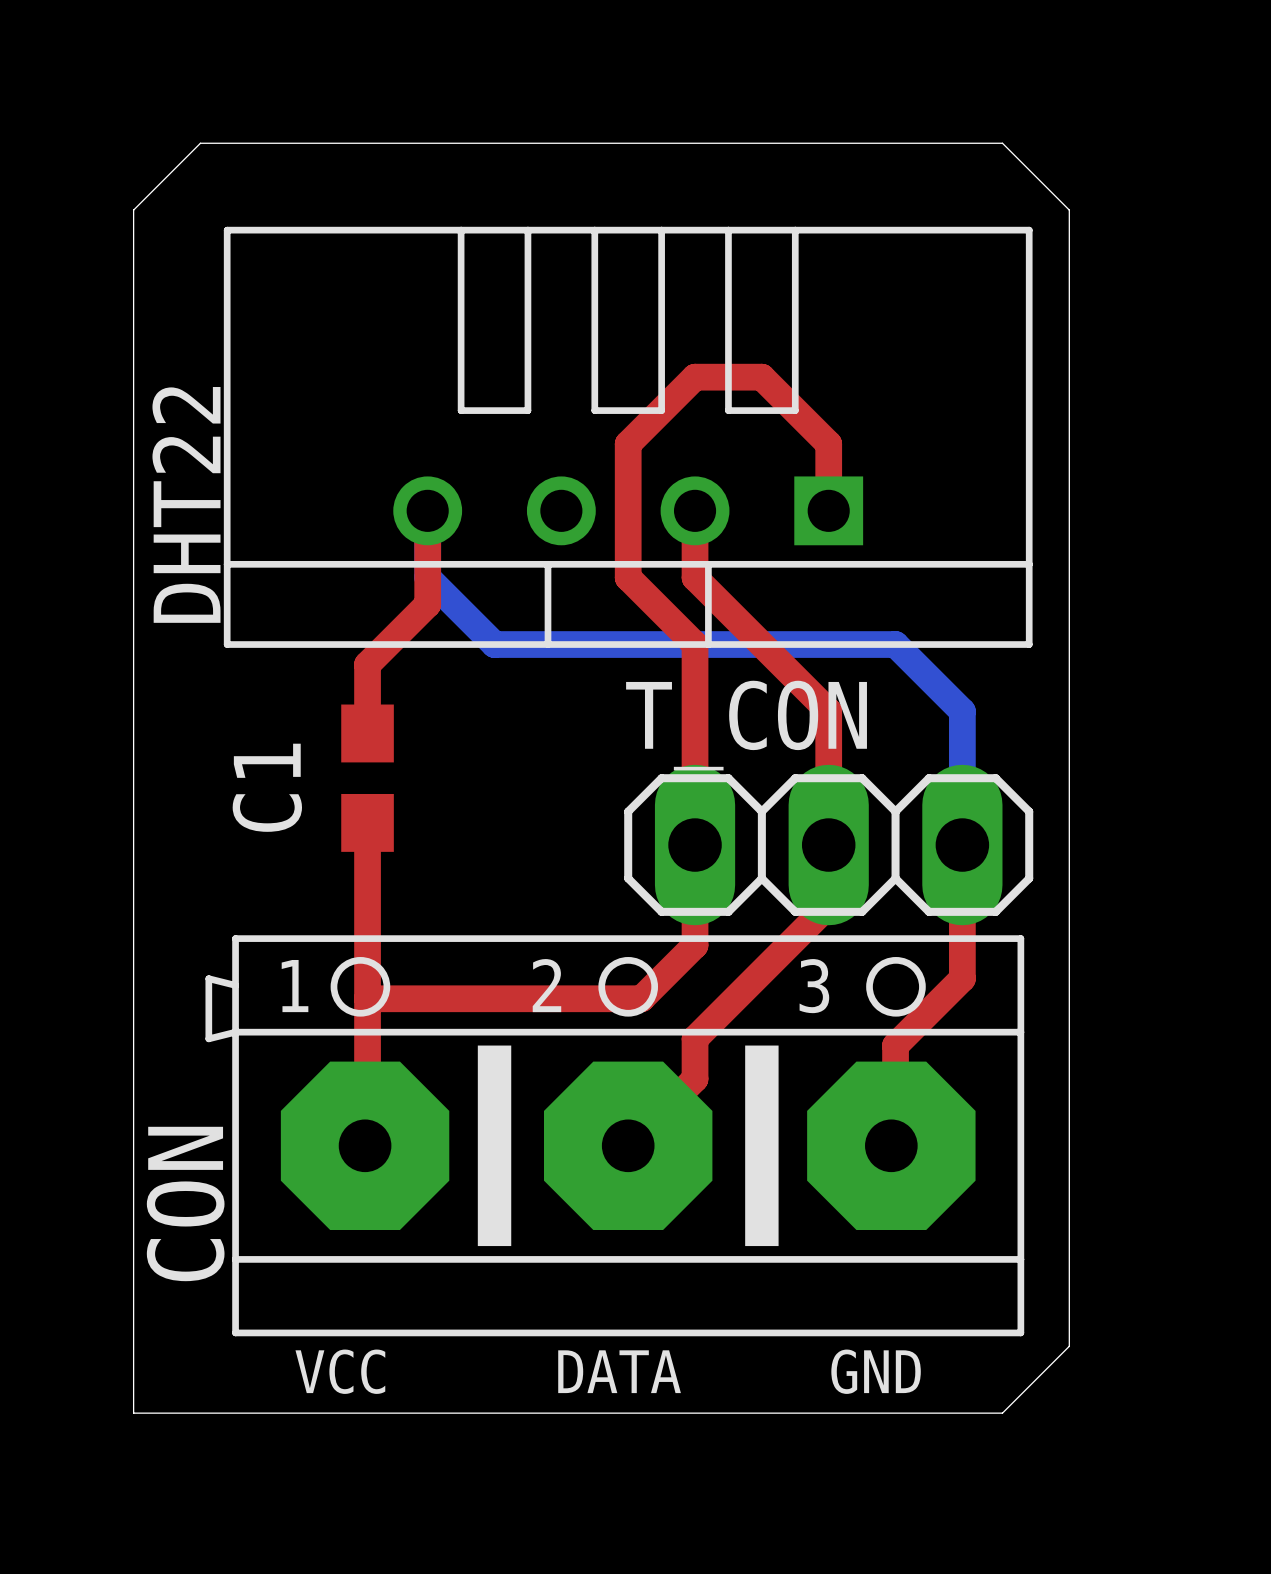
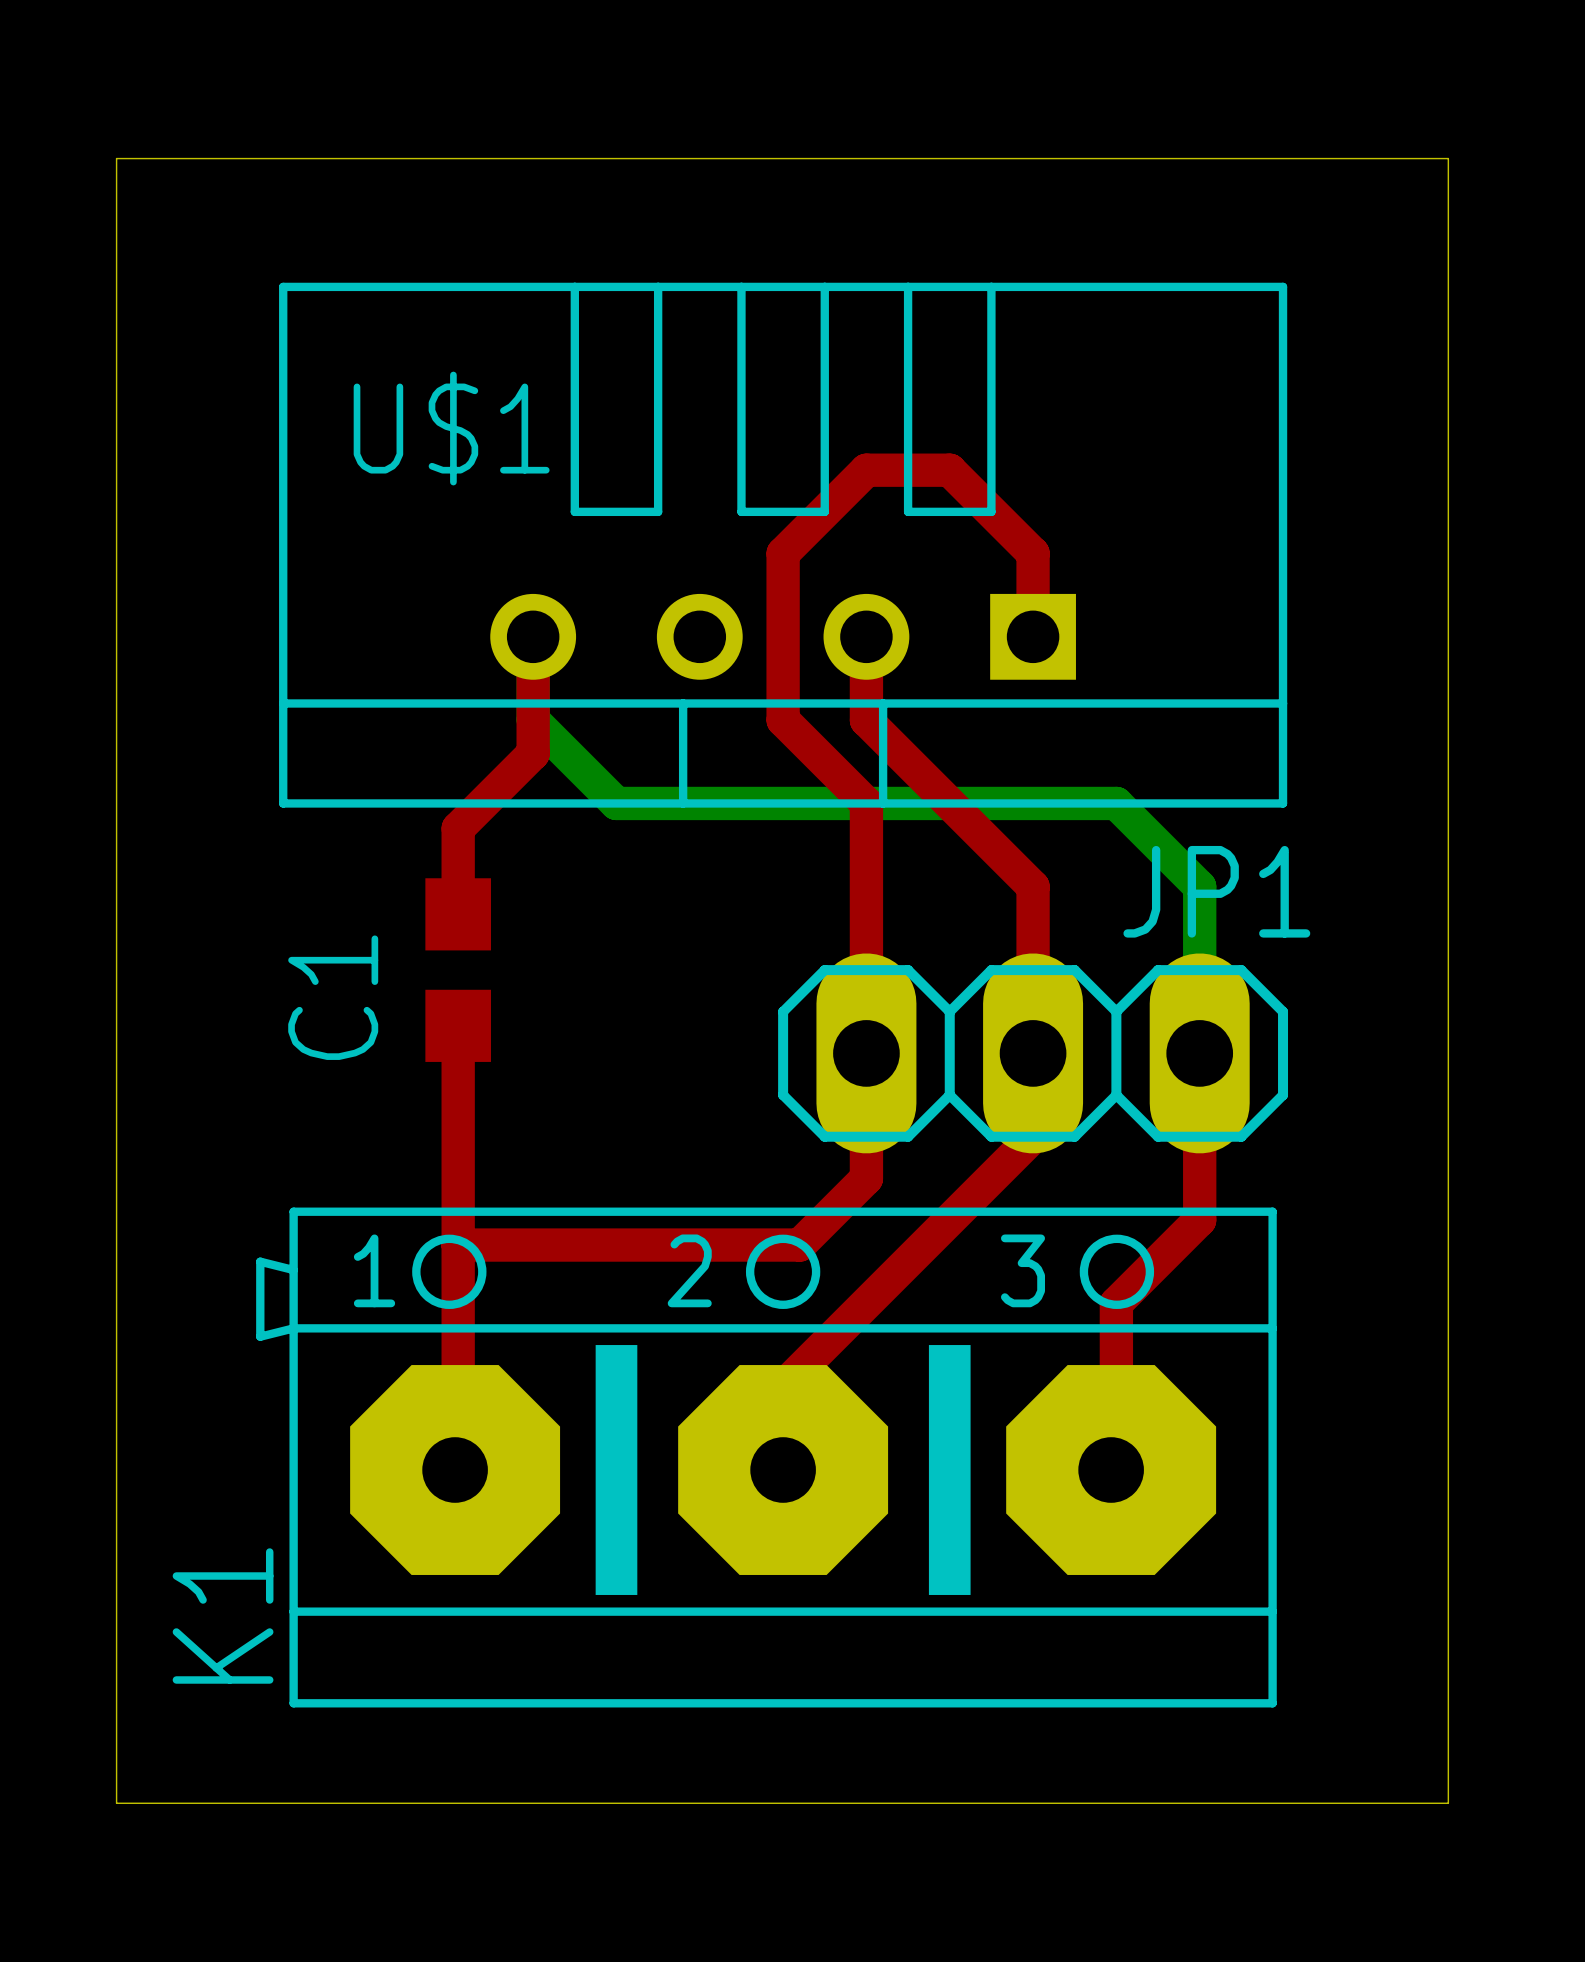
board edge: (200, 143) (1002, 143) (1069, 210) (1069, 1346) (1002, 1413) (133, 1413) (133, 210) (200, 143) -> (116, 158) (116, 1803) (1448, 1803) (1448, 158) (116, 158)
DHT22 name: DHT22 (186, 504) -> U$1 (451, 428)
T_CON name: T_CON (746, 725) -> JP1 (1216, 891)
top track: (828, 905) (695, 1038) (695, 1078) (628, 1145) -> (1033, 1128) (1033, 1136) (783, 1386) (783, 1470)
CON position: (614, 1135) -> (766, 1457)
CON name: CON (185, 1203) -> K1 (223, 1616)
text: VCC (340, 1371) -> none
text: DATA (619, 1371) -> none
text: GND (876, 1371) -> none

